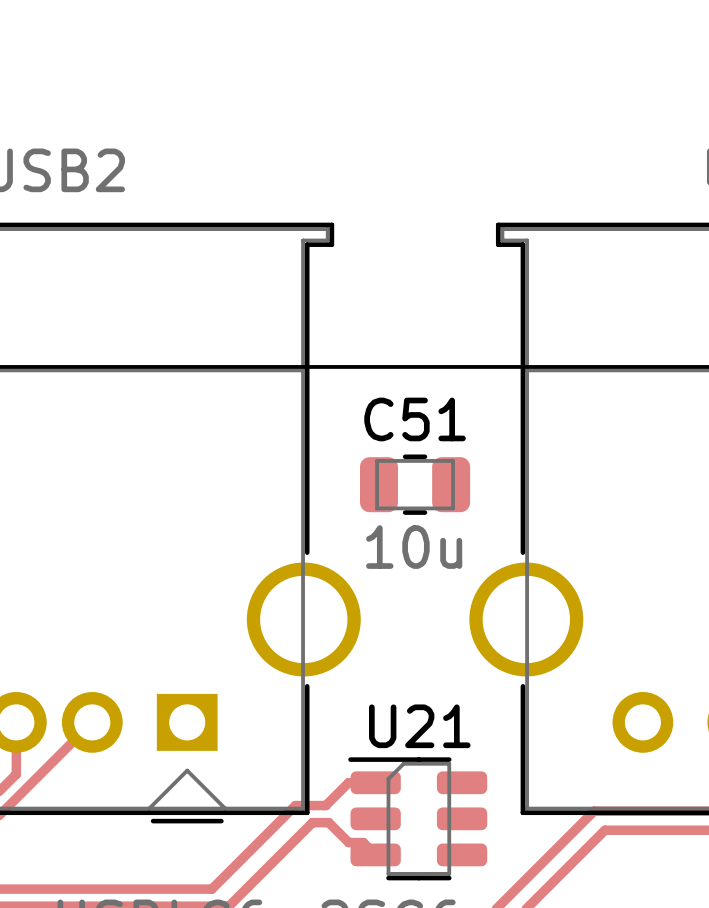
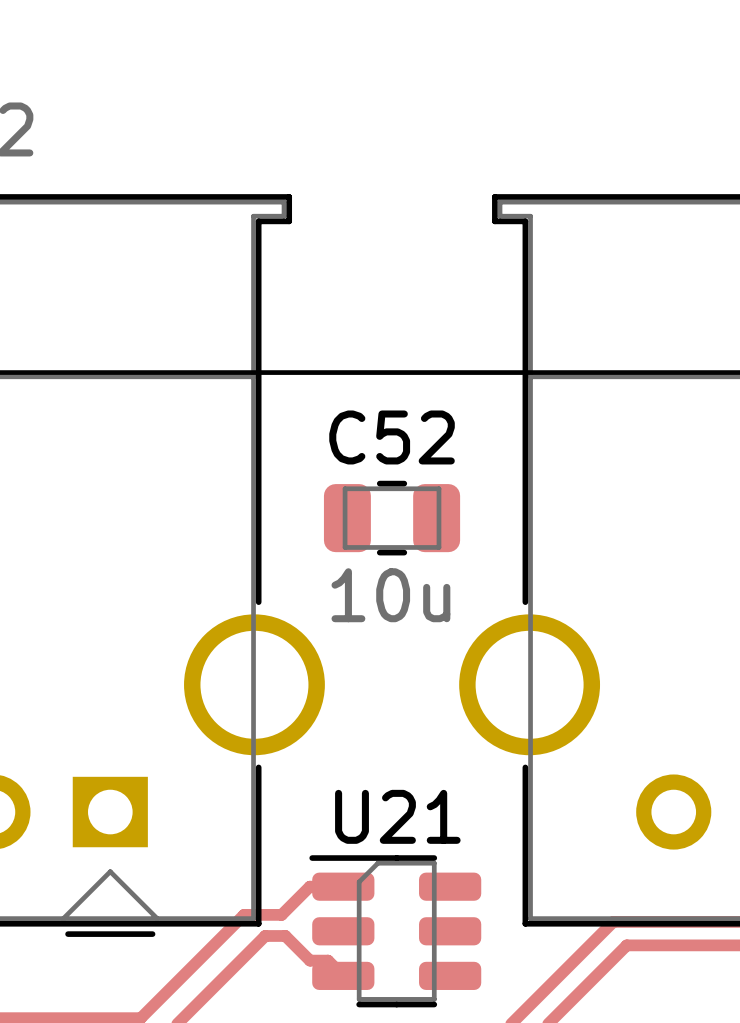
C51 name: C51 (415, 419) -> C52 (392, 437)

